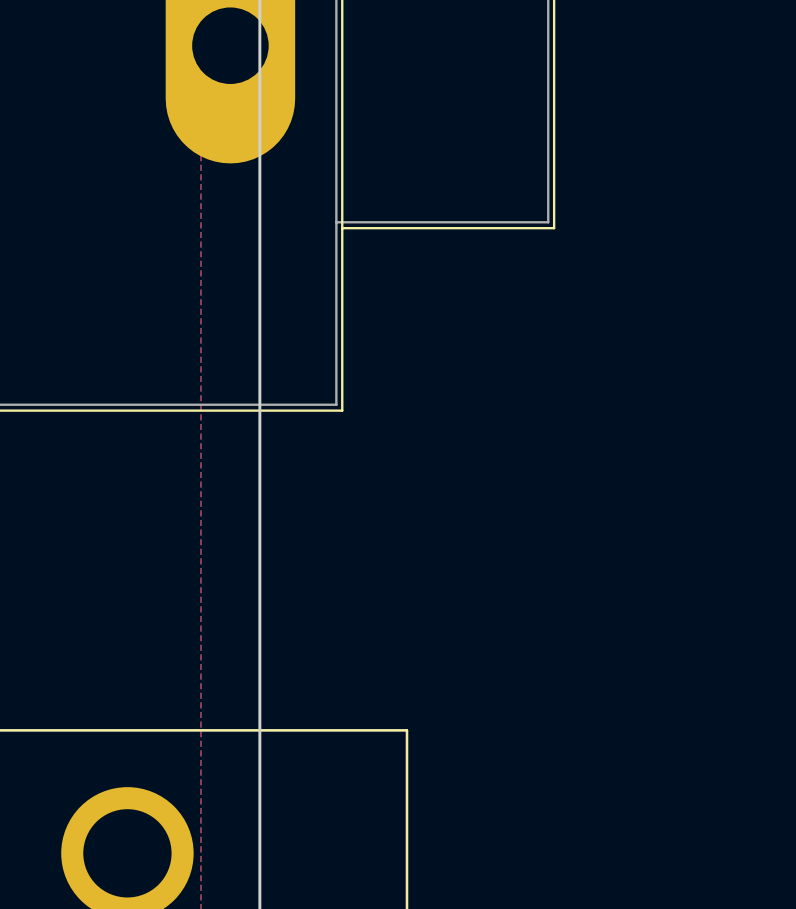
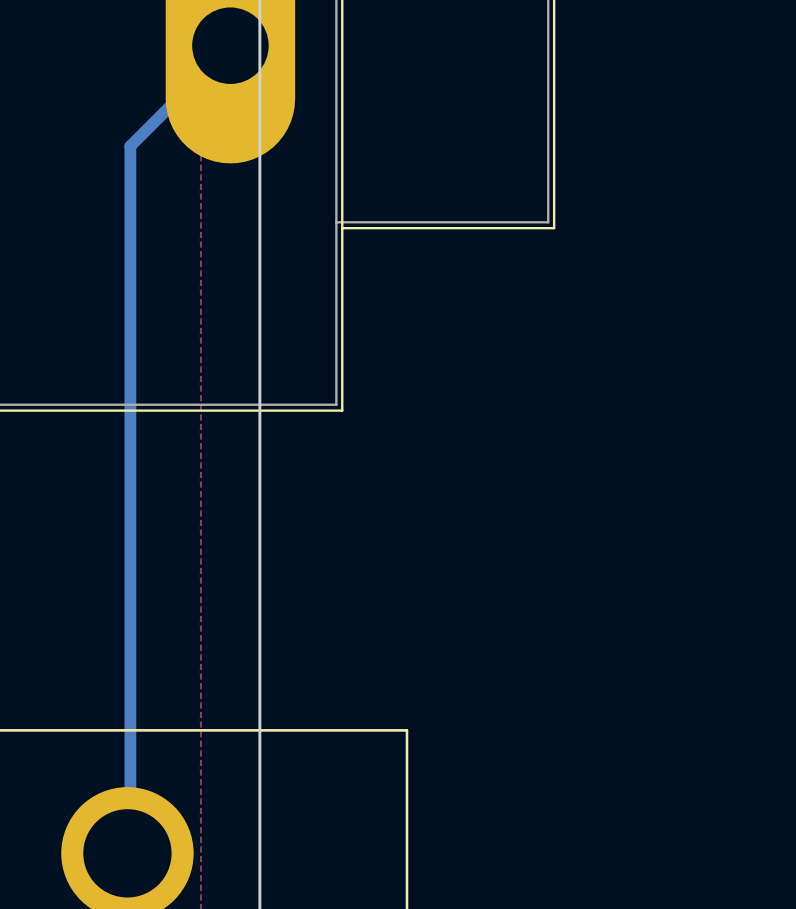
bottom track: none -> (230, 46) (130, 146) (130, 852) (127, 853)

